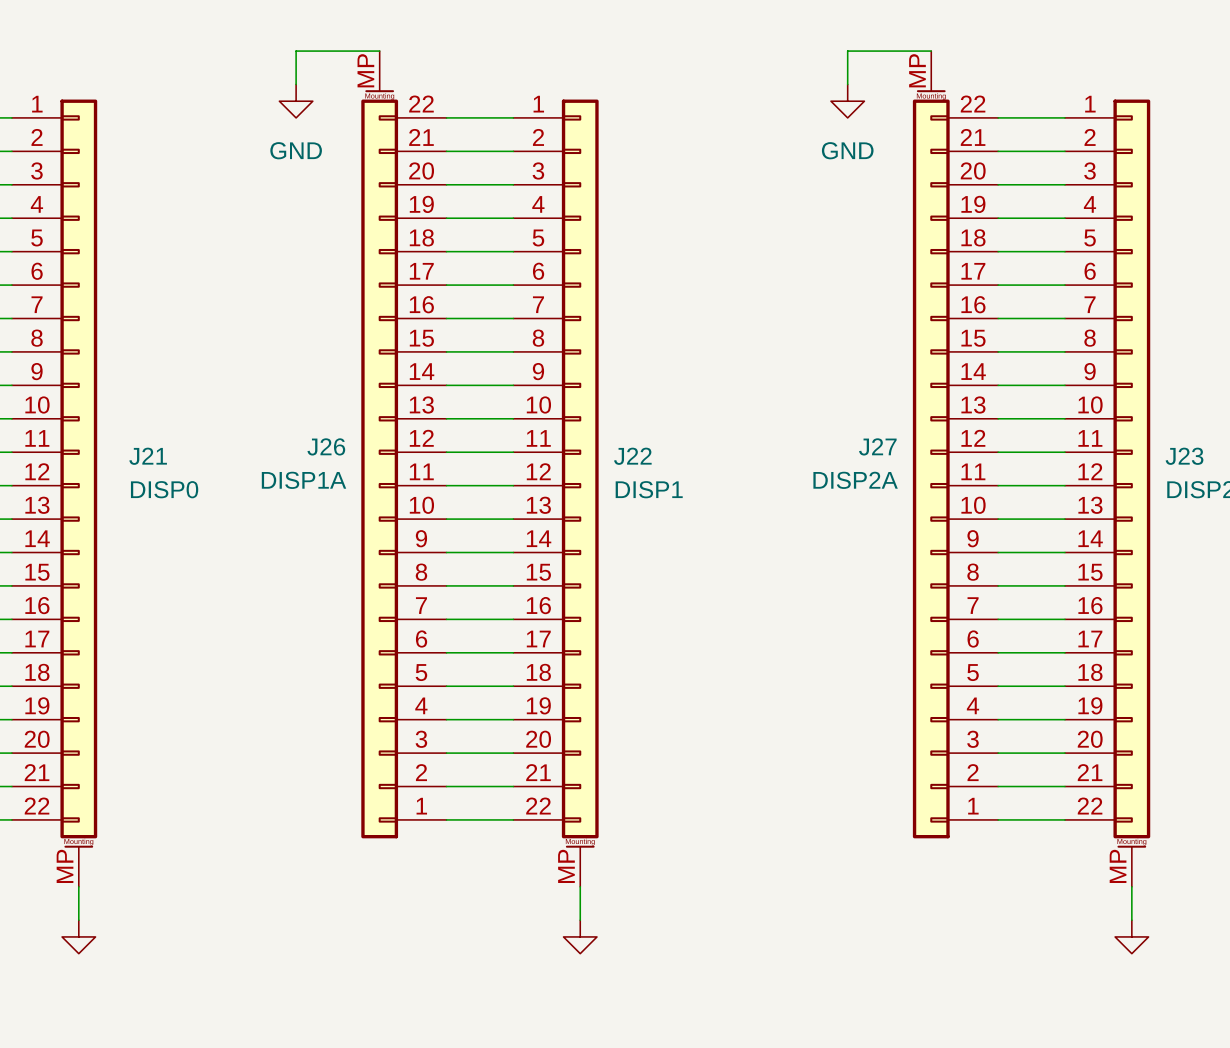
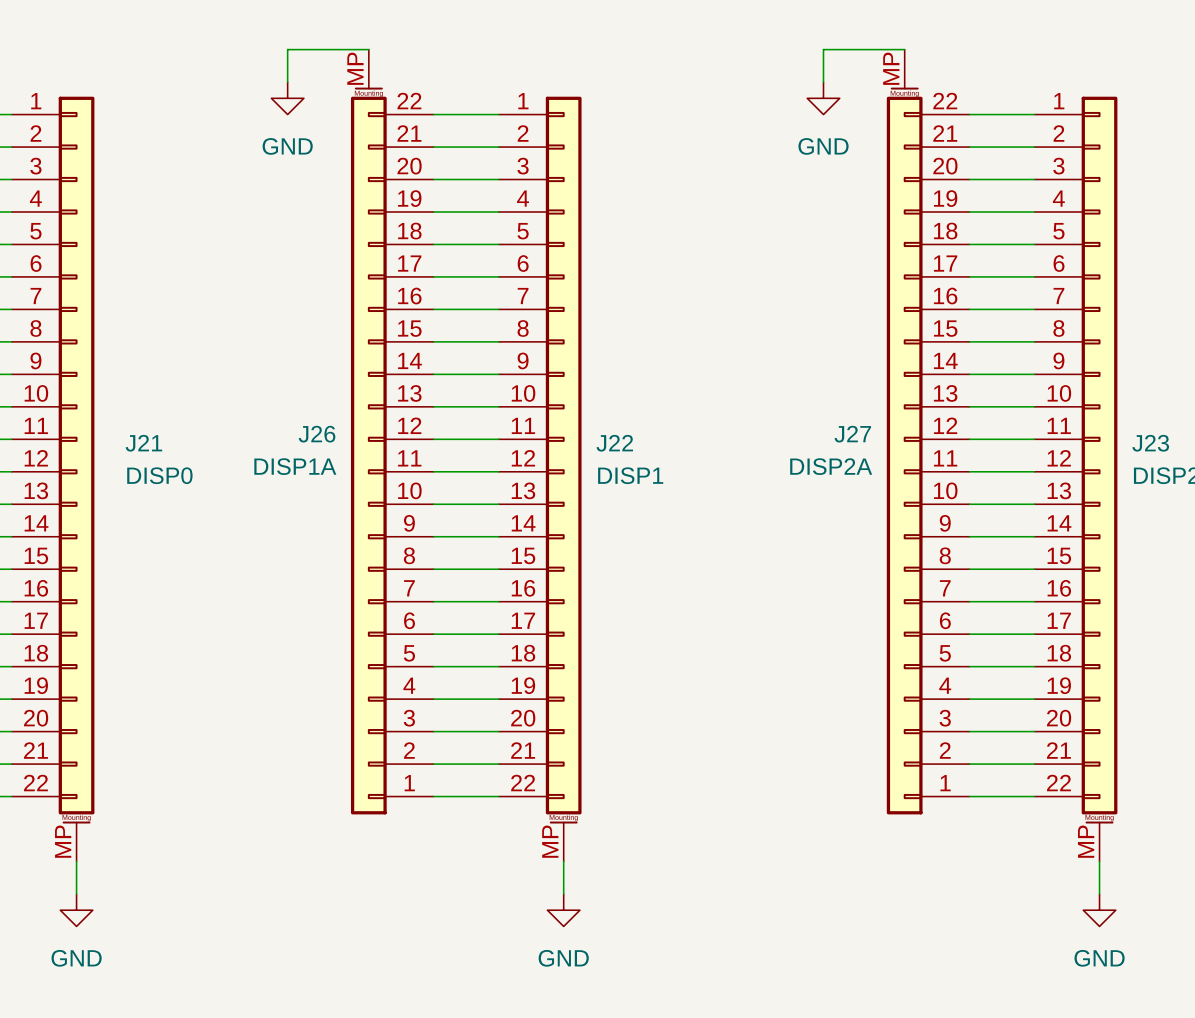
power symbol text: none -> GND (76, 958)
power symbol text: none -> GND (563, 958)
power symbol text: none -> GND (1099, 958)

